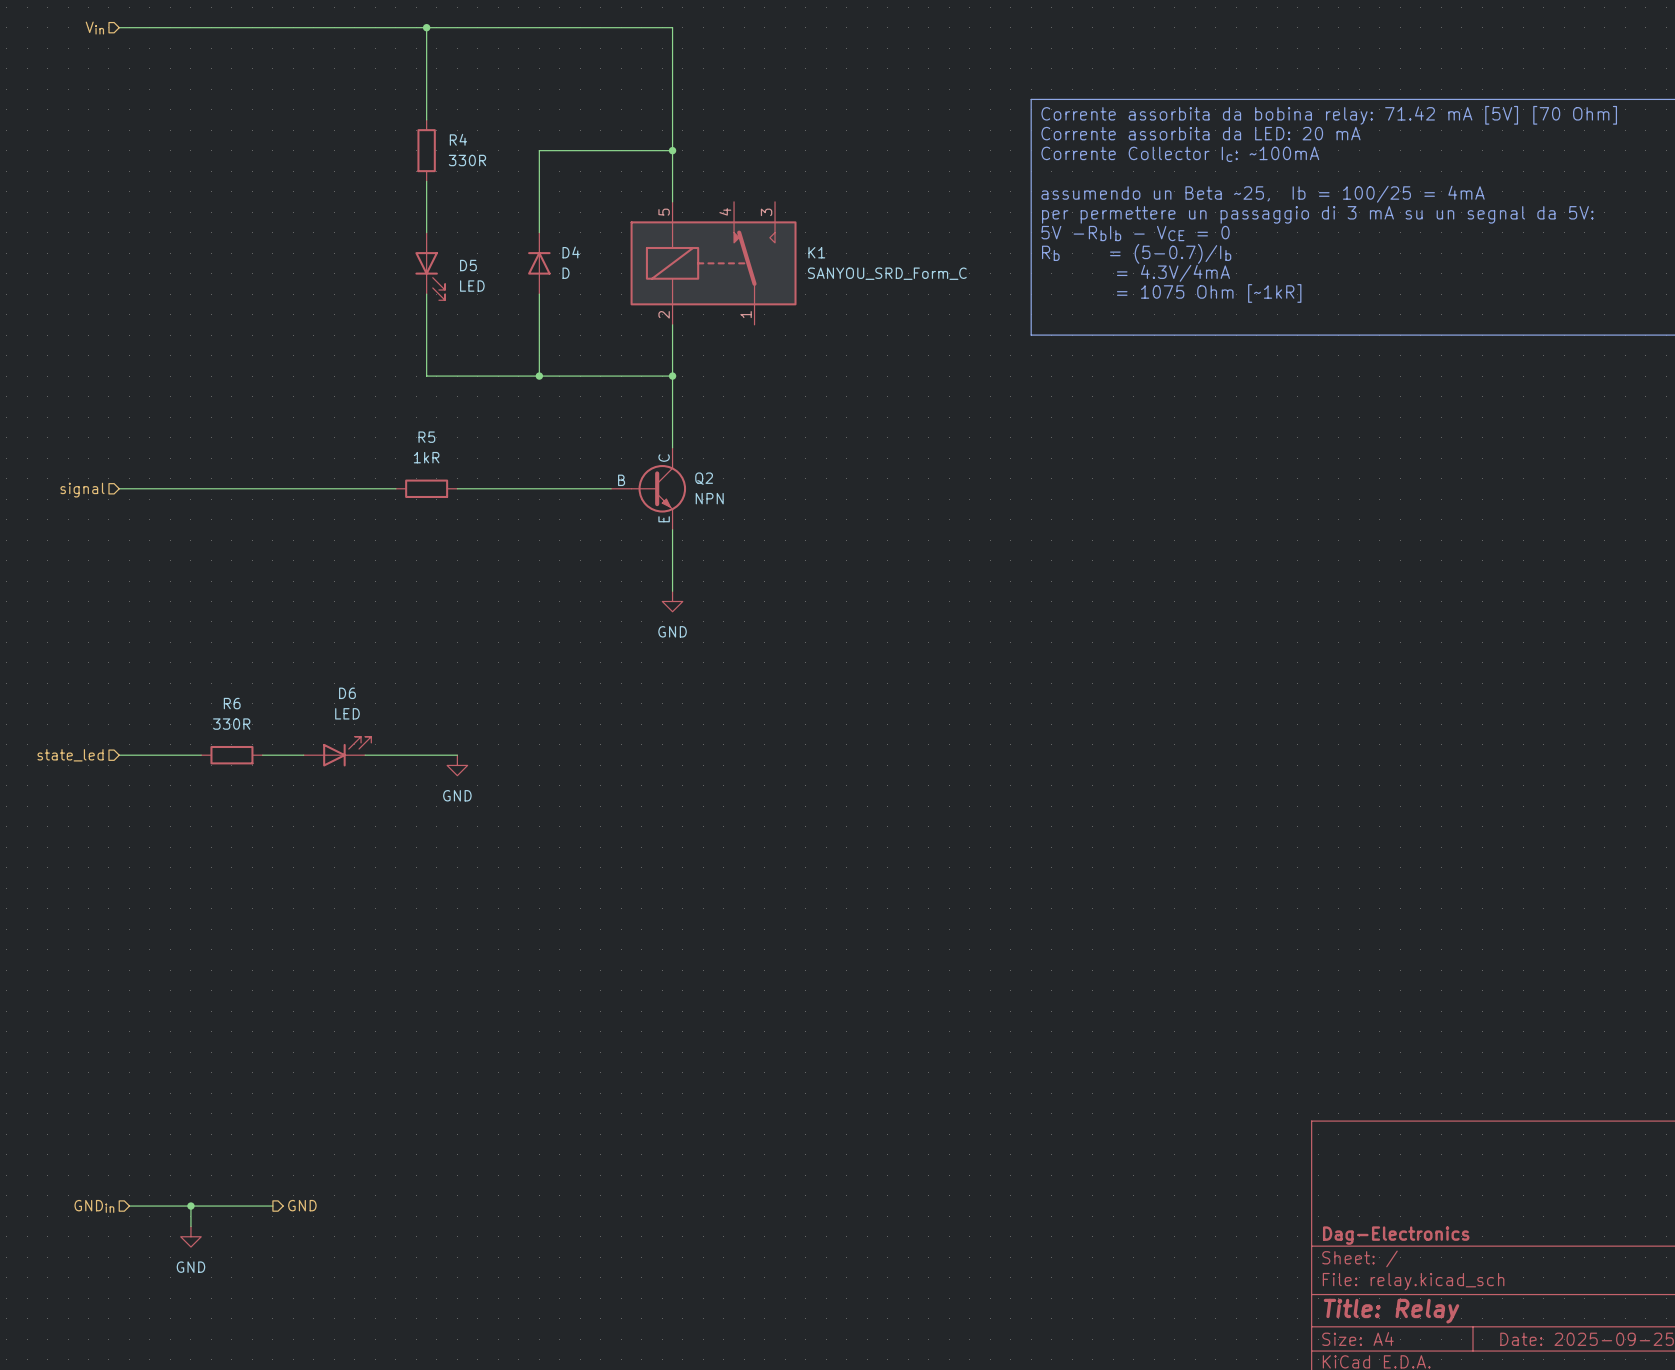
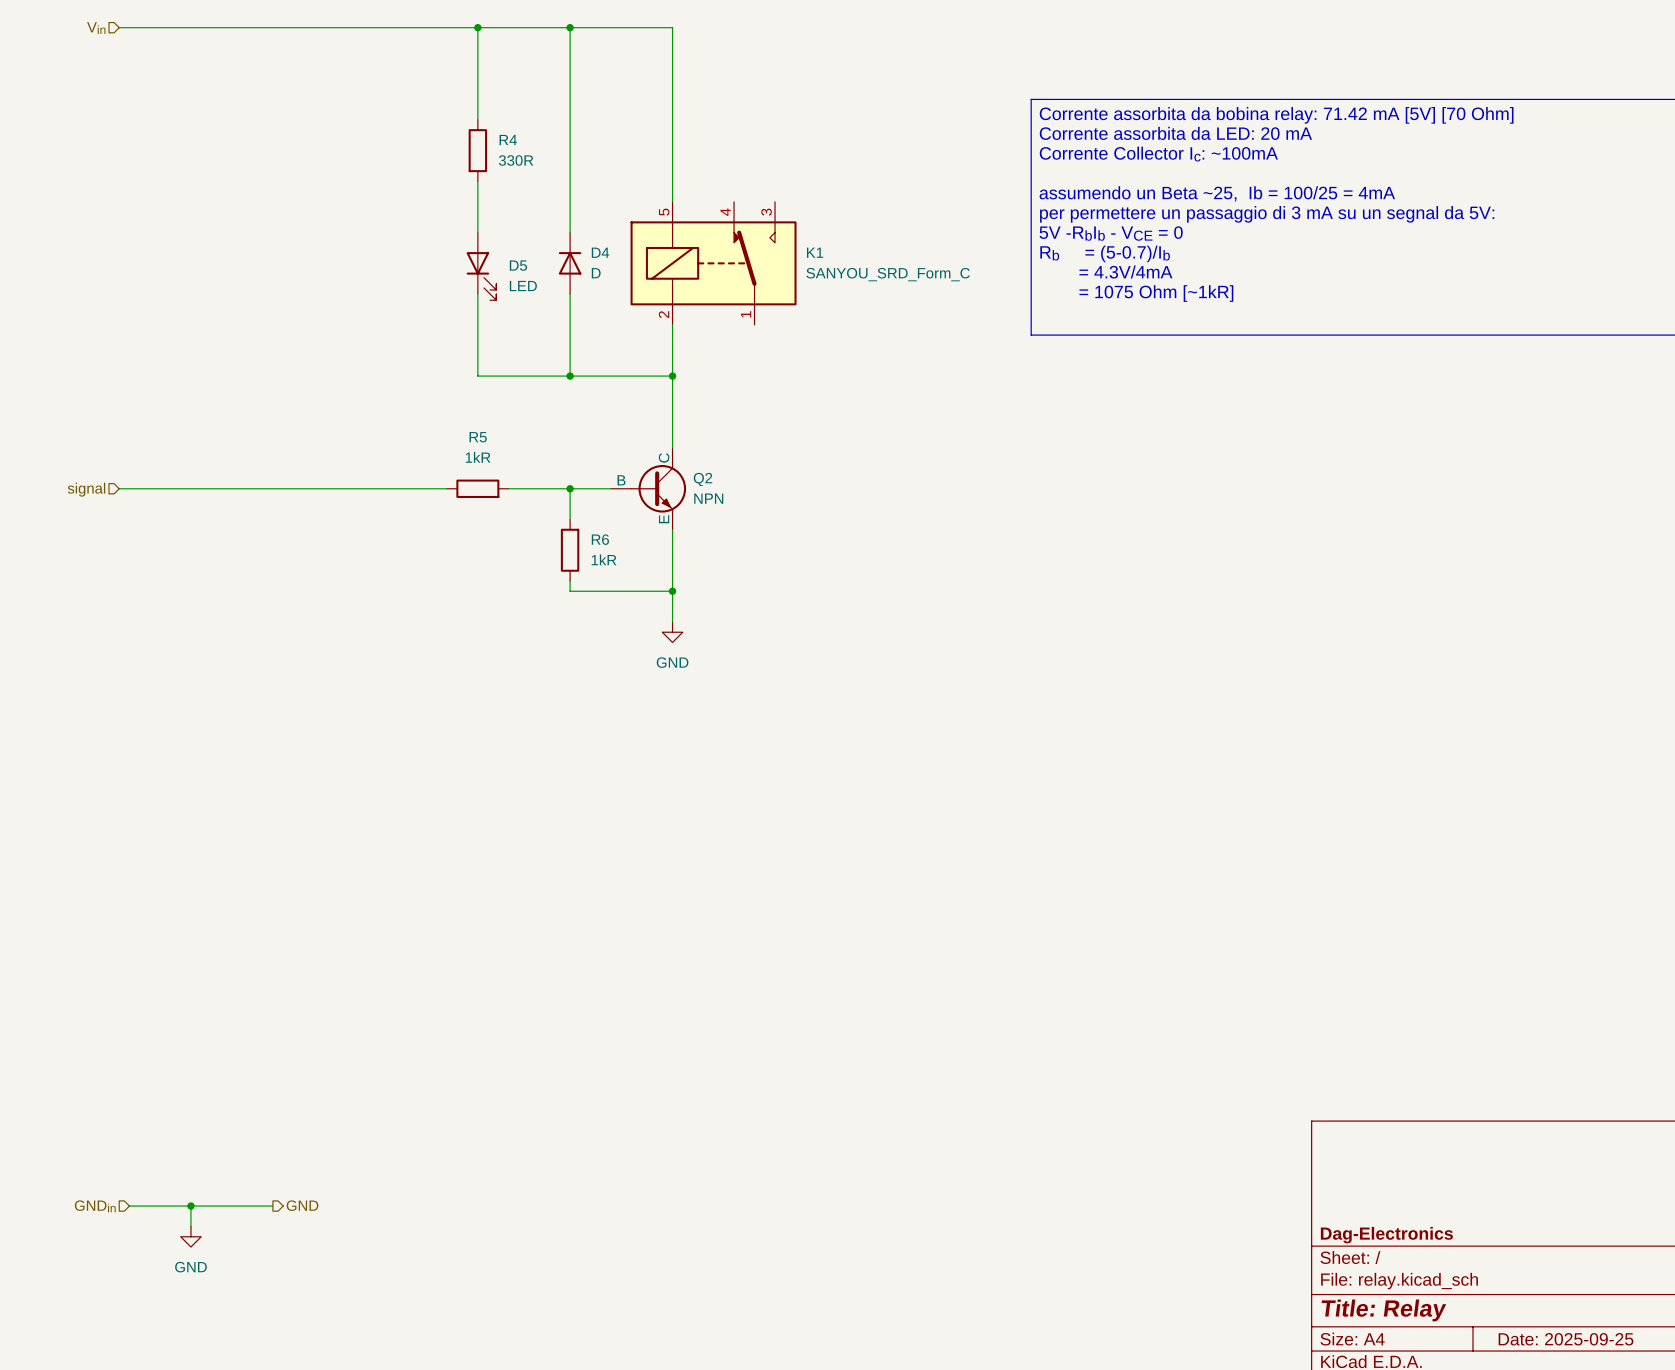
wire: (426, 27) (426, 119) -> (477, 27) (477, 119)
junction: (426, 27) -> none
junction: none -> (477, 27)
wire: none -> (570, 27) (570, 232)
junction: none -> (570, 27)
R4 position: (426, 150) -> (477, 150)
wire: (672, 150) (539, 150) (539, 232) -> none
junction: (672, 150) -> none
wire: (426, 181) (426, 232) -> (477, 181) (477, 232)
D4 position: (539, 263) -> (570, 263)
D5 position: (430, 266) -> (481, 266)
wire: (426, 294) (426, 376) (477, 376) -> (477, 294) (477, 376)
wire: (539, 294) (539, 376) -> (570, 294) (570, 376)
junction position: (539, 376) -> (570, 376)
R5 position: (426, 488) -> (477, 488)
wire: (457, 488) (508, 488) -> (395, 488) (447, 488)
wire: none -> (570, 488) (570, 519)
junction: none -> (570, 488)
wire: none -> (570, 581) (570, 591) (672, 591) (672, 621)
junction: none -> (672, 591)
power symbol position: GND (672, 601) -> GND (672, 632)
R6 name position: R6 (232, 703) -> R6 (600, 539)
R6 value: 330R (231, 724) -> 1kR (604, 559)
D6: LED (337, 751) -> none
hierarchical label: state_led (70, 755) -> none
wire: (119, 755) (201, 755) -> none
R6 rotation: 0° (231, 755) -> 90° clockwise (570, 550)
R6 position: (231, 755) -> (570, 550)
wire: (262, 755) (303, 755) -> none
wire: (365, 755) (457, 755) -> none
power symbol: GND (457, 765) -> none

